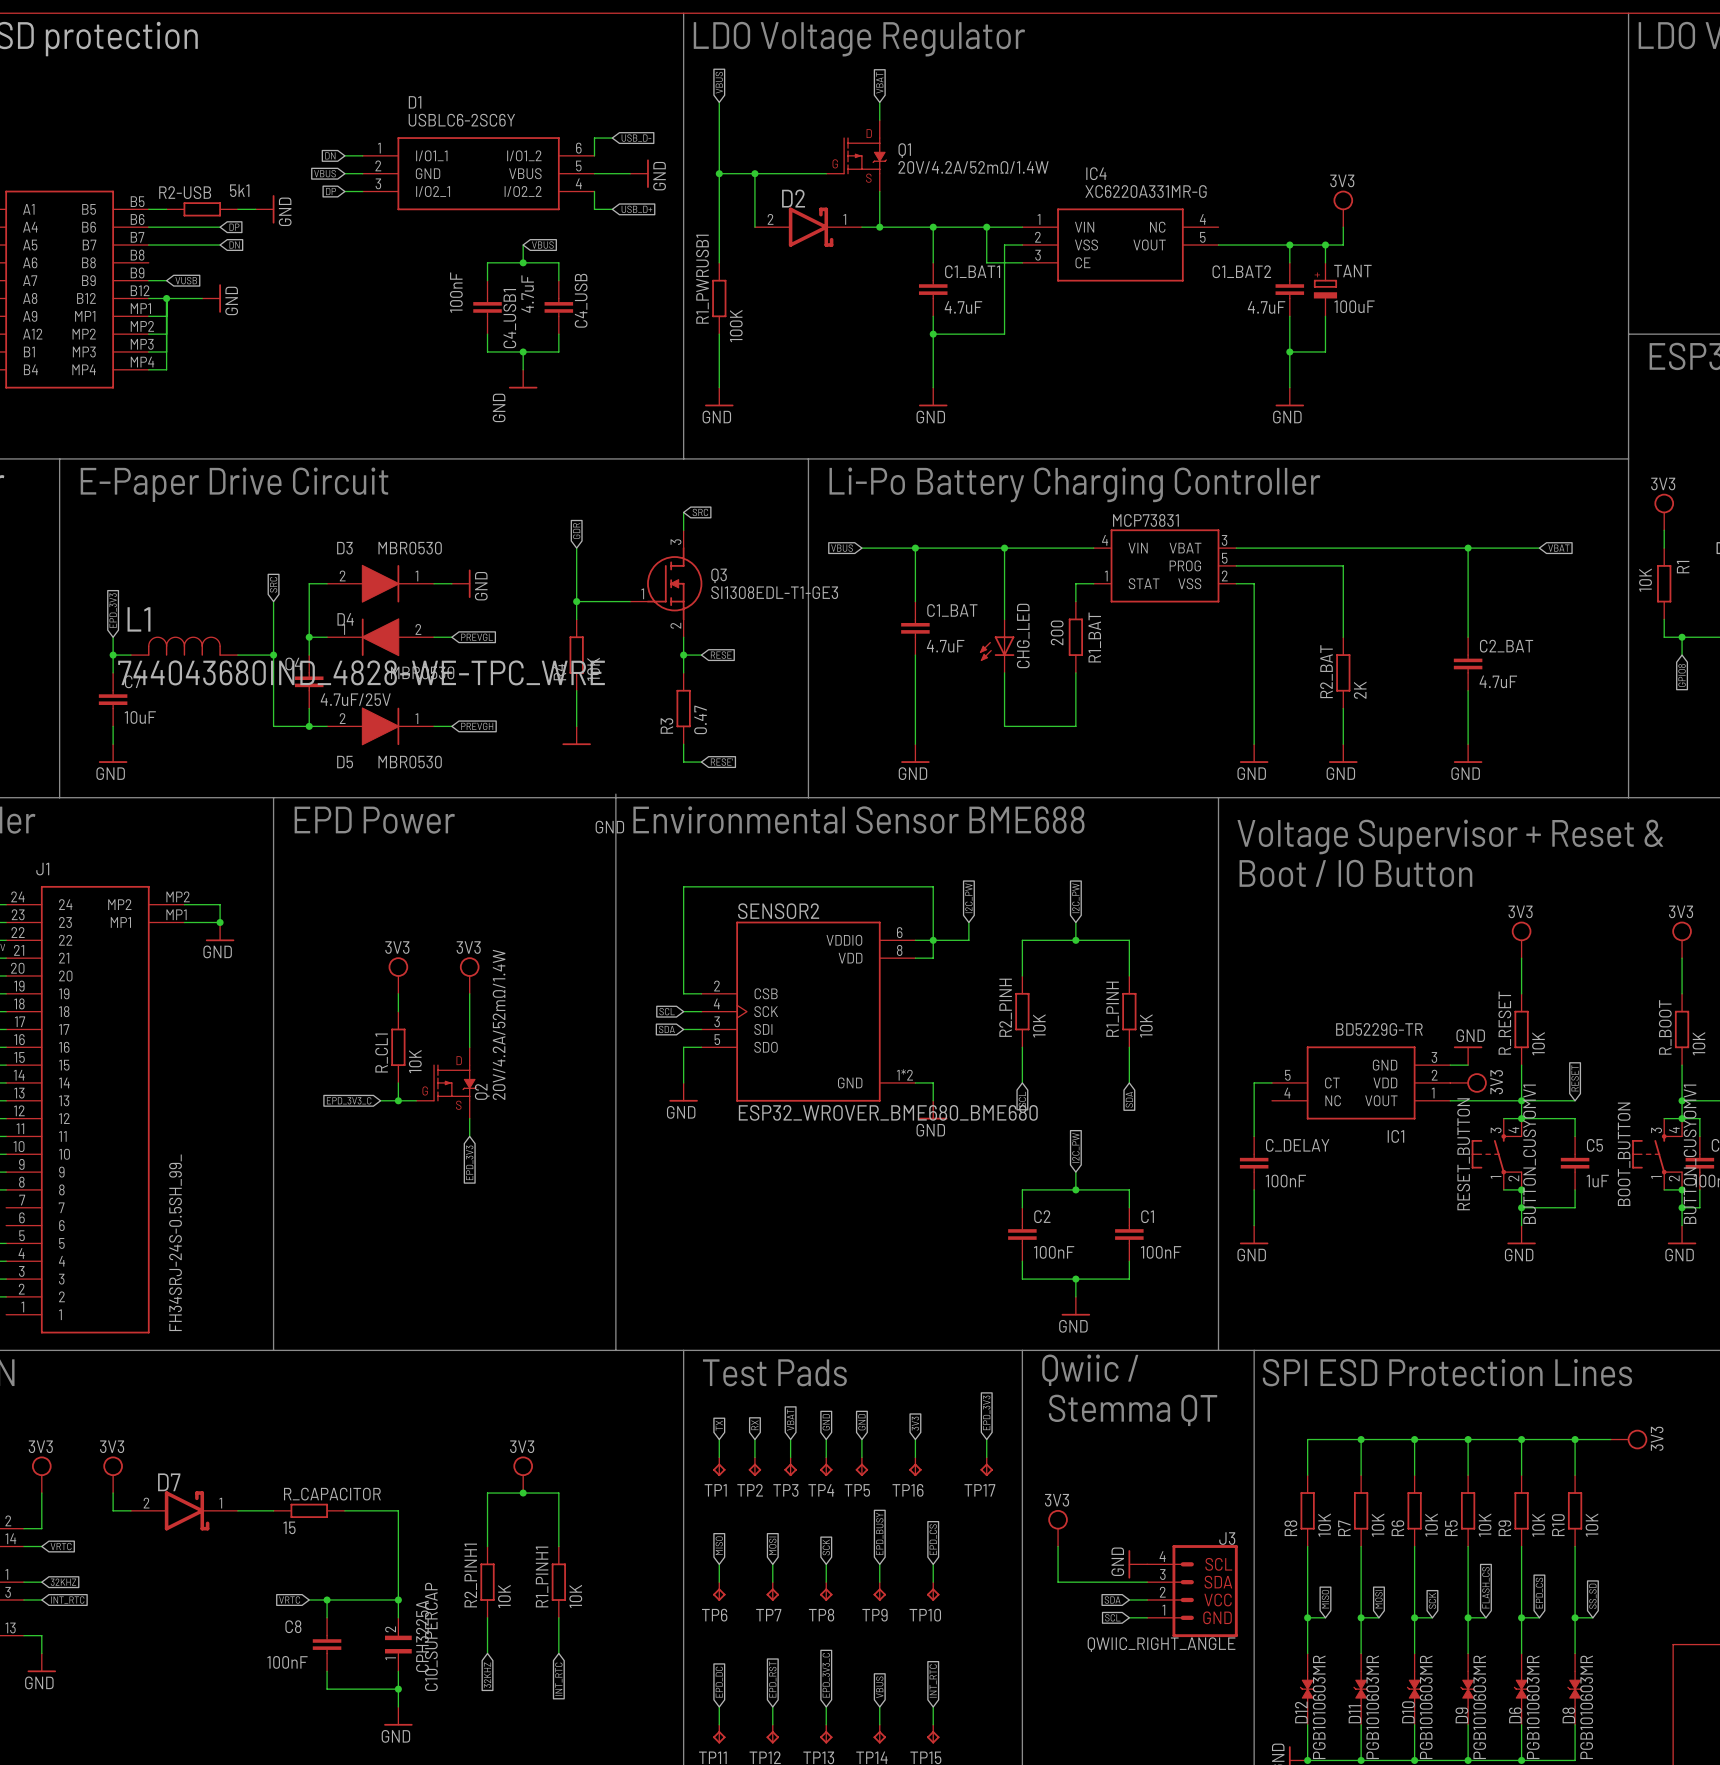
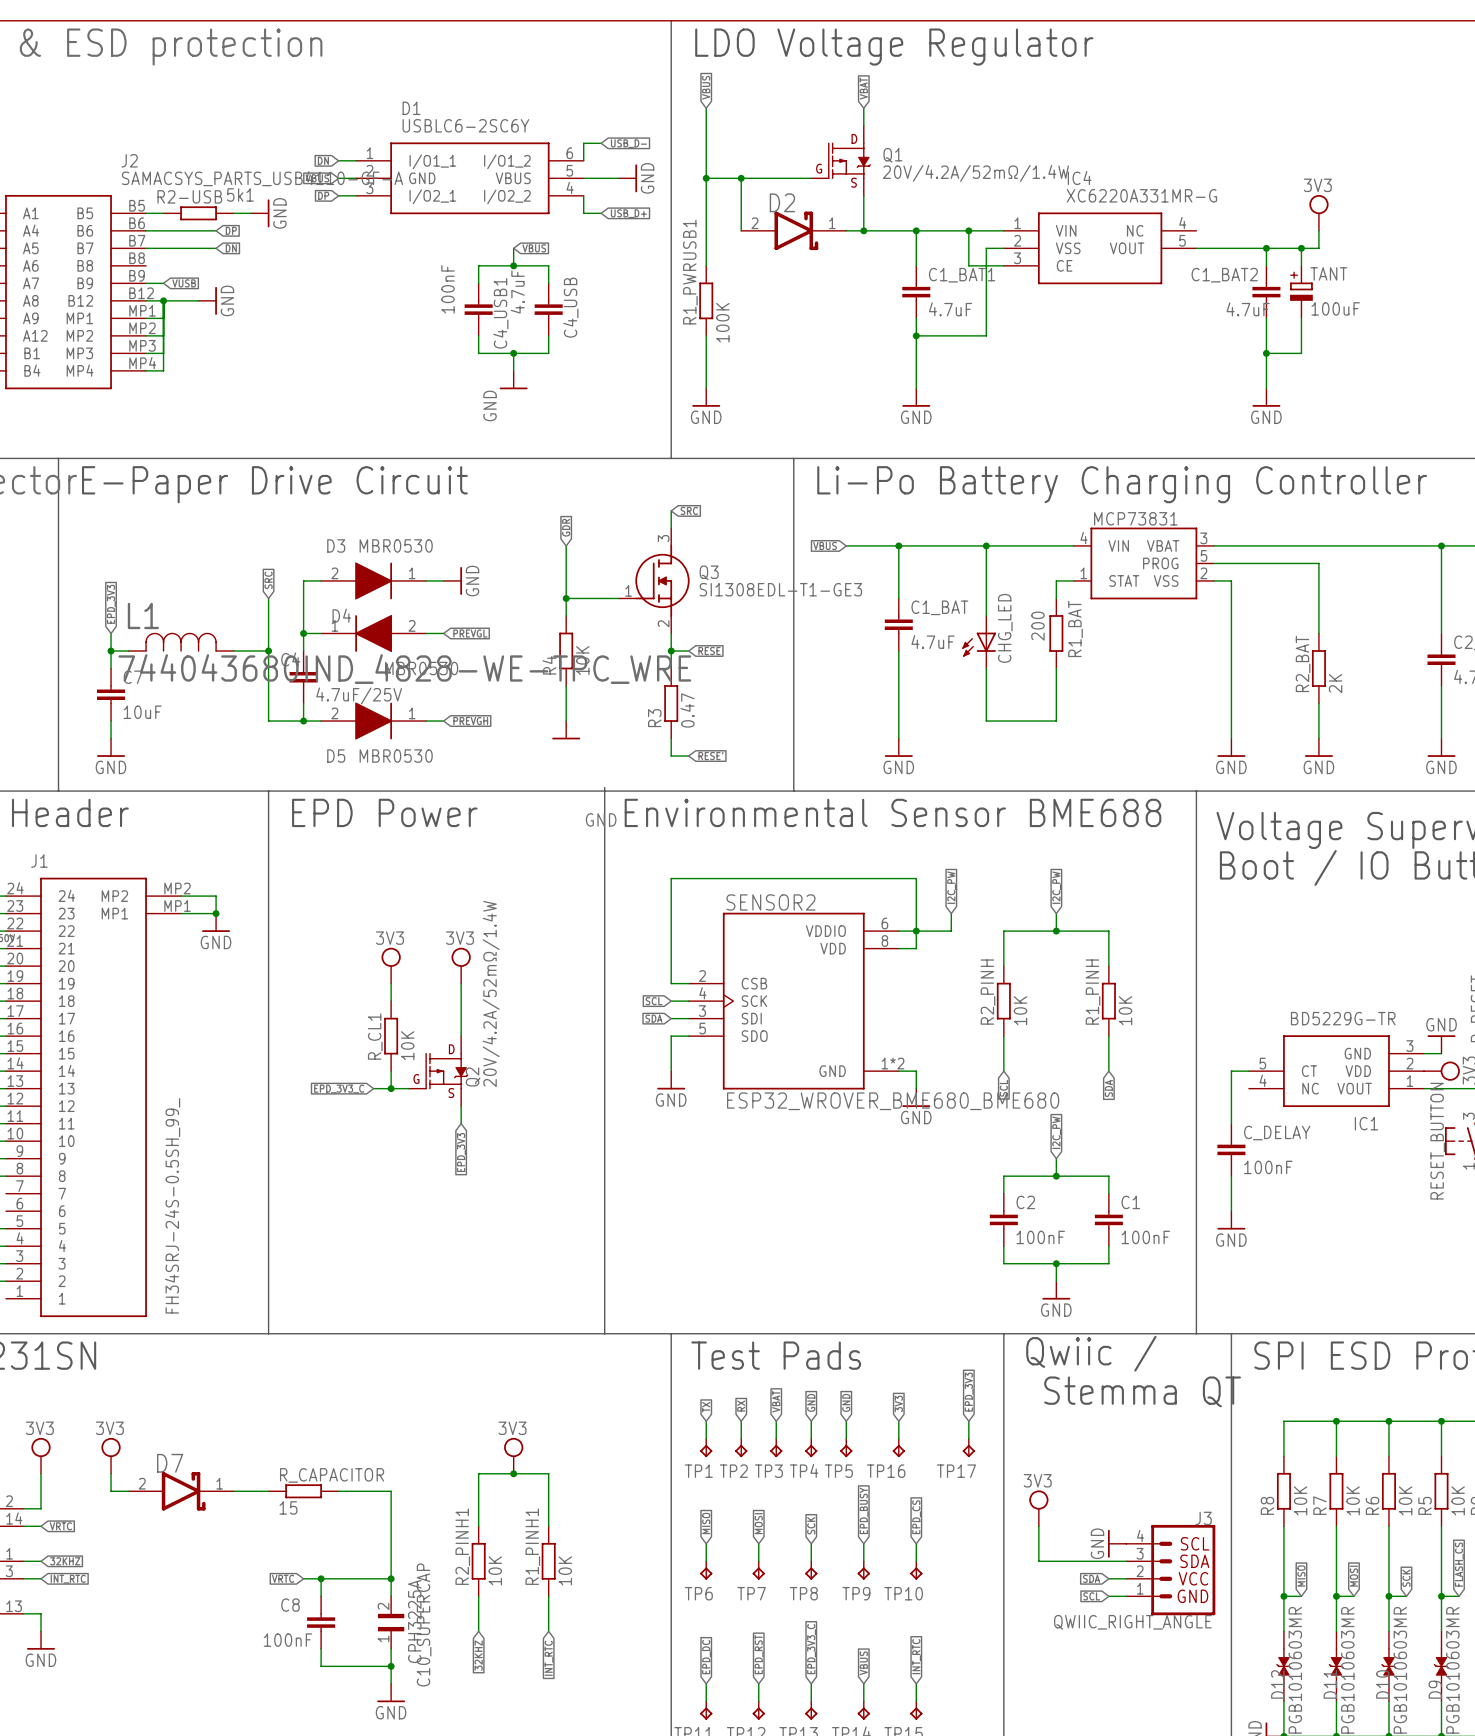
J2 name: none -> J2 (129, 160)
J2 value: none -> SAMACSYS_PARTS_USB4110-GF-A (262, 178)

